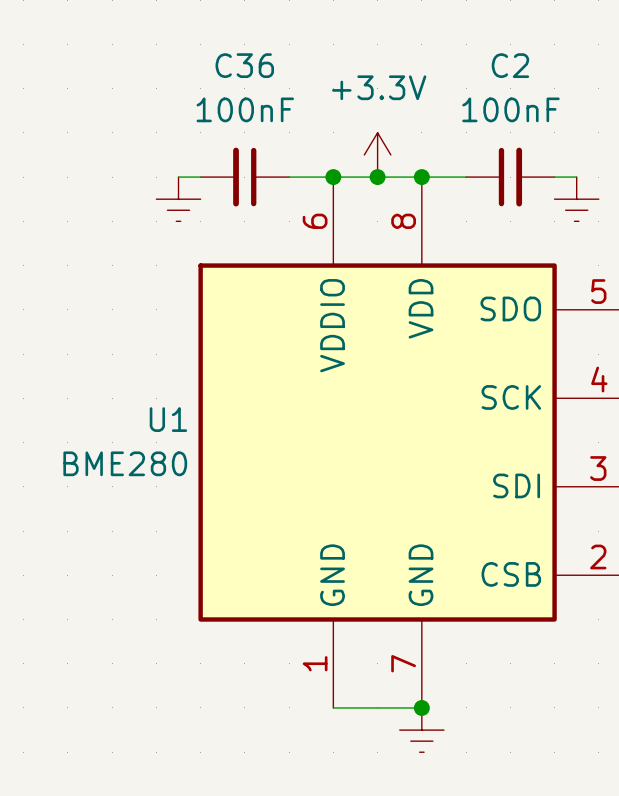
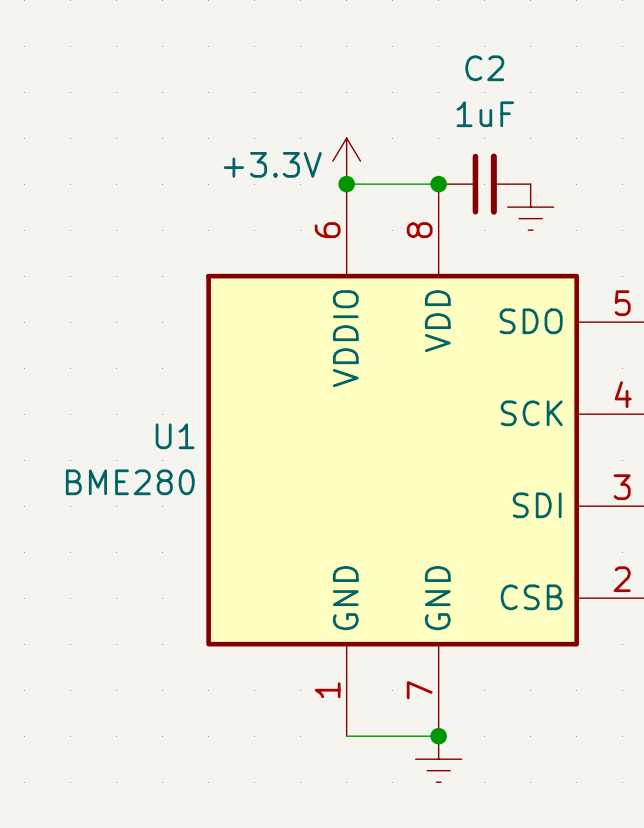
power symbol text position: +3.3V (379, 87) -> +3.3V (272, 164)
C2 value: 100nF (510, 109) -> 1uF (485, 114)
power symbol position: +3.3V (377, 154) -> +3.3V (346, 161)
wire: (178, 177) (200, 177) -> none
C36: 100nF (244, 177) -> none
wire: (289, 177) (333, 177) -> none
junction: (377, 177) -> none
C2 position: (510, 177) -> (484, 184)
wire: (554, 177) (576, 177) -> none
power symbol: (178, 199) -> none
power symbol position: (576, 199) -> (530, 207)

